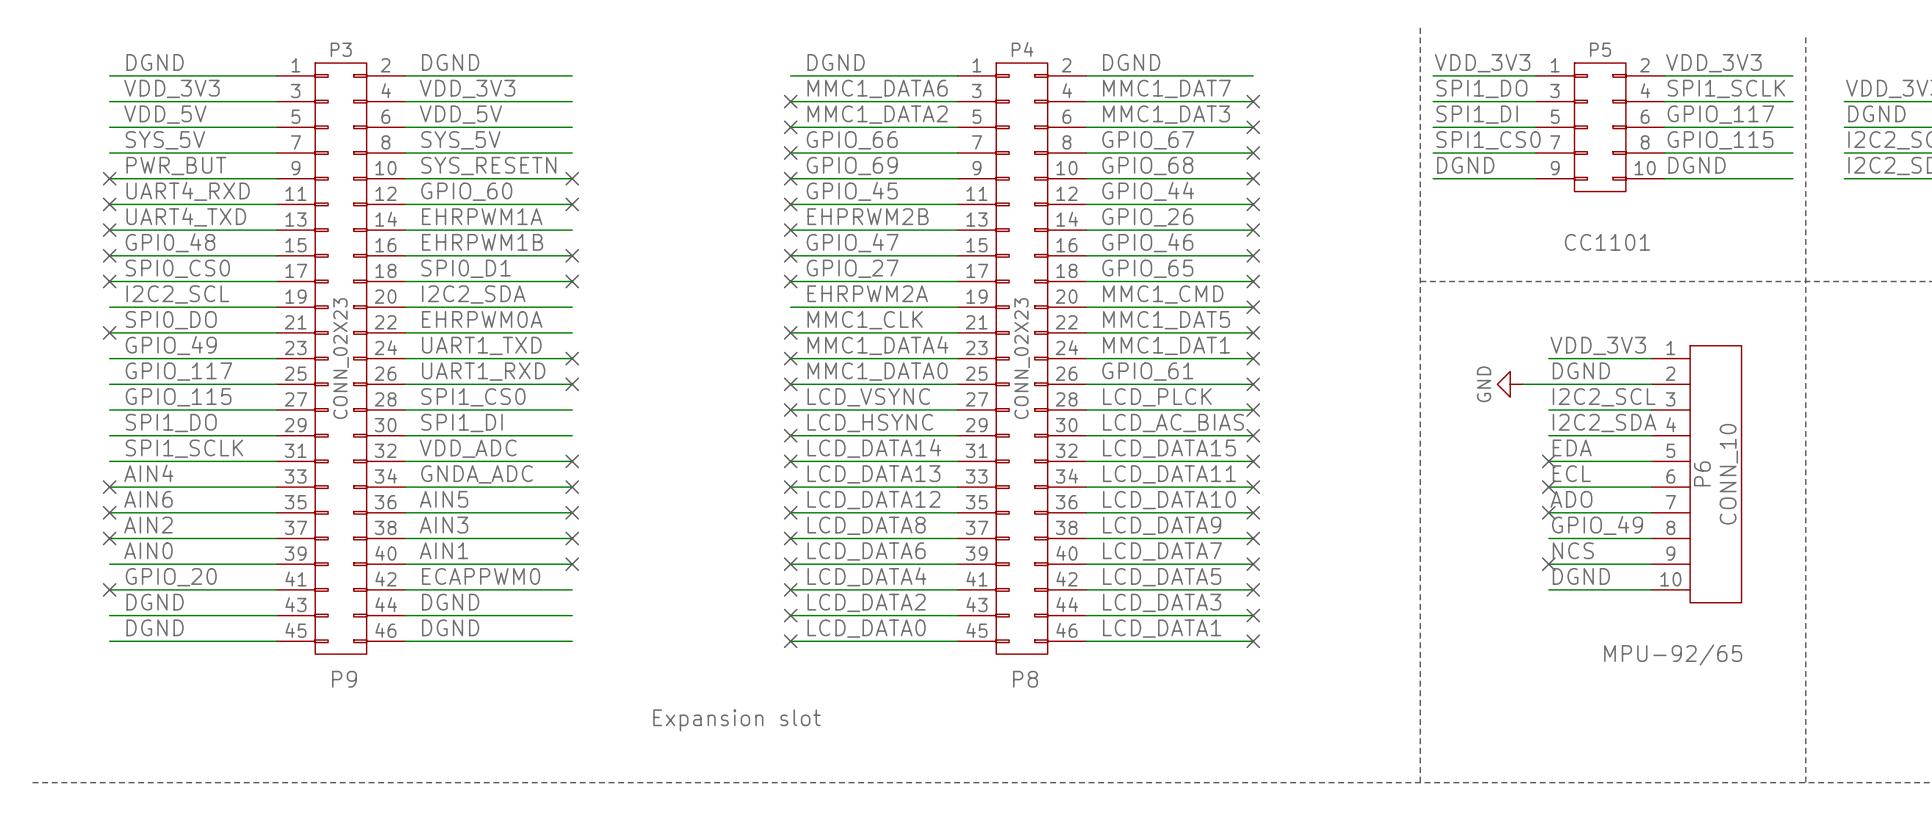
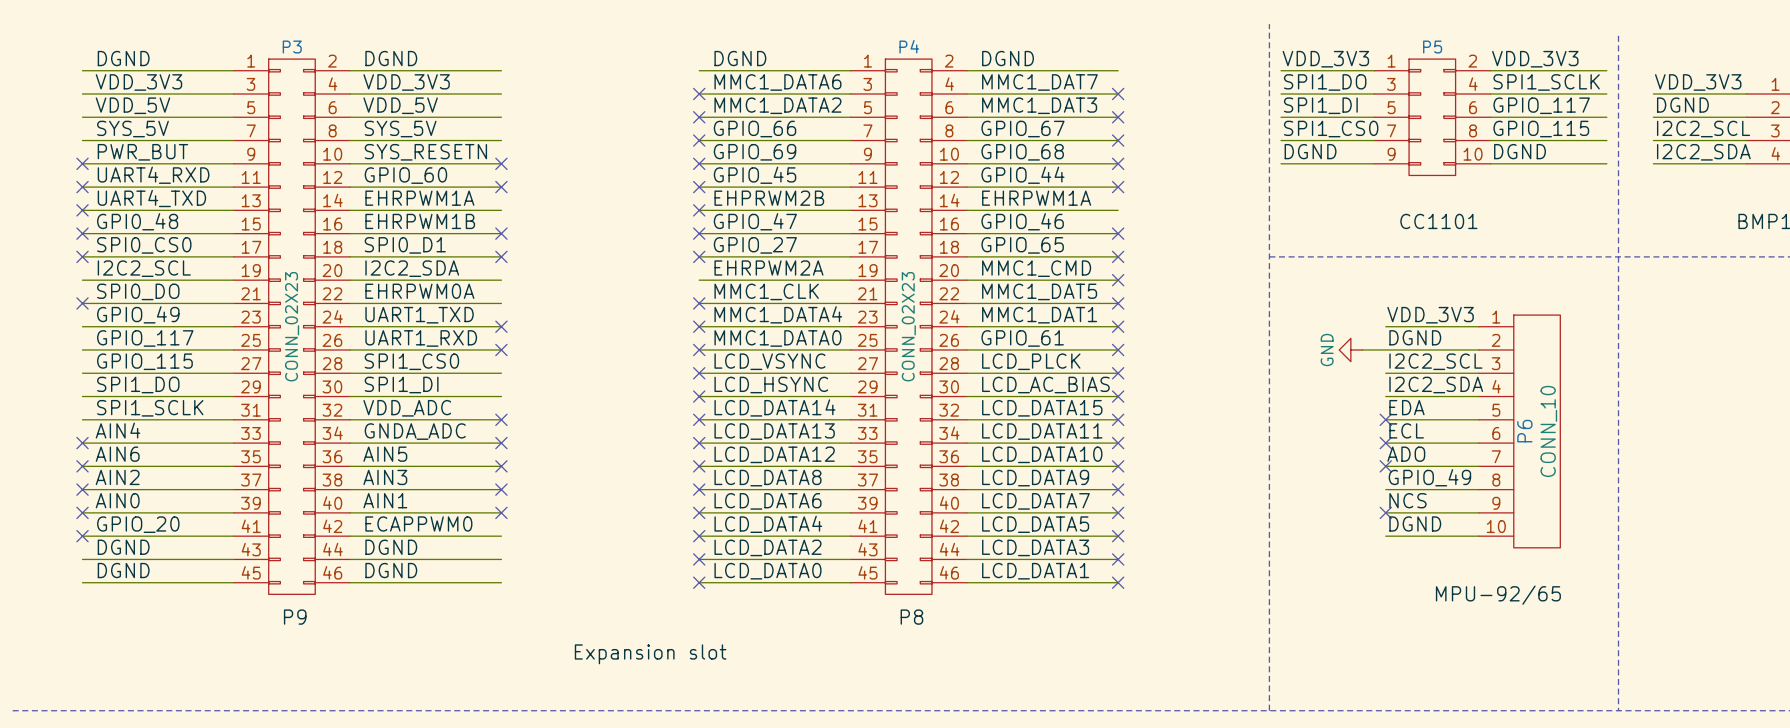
label: GPIO_26 (1147, 217) -> EHRPWM1A (1036, 198)
no-connect mark: (1253, 230) -> none
no-connect mark: none -> (82, 512)

